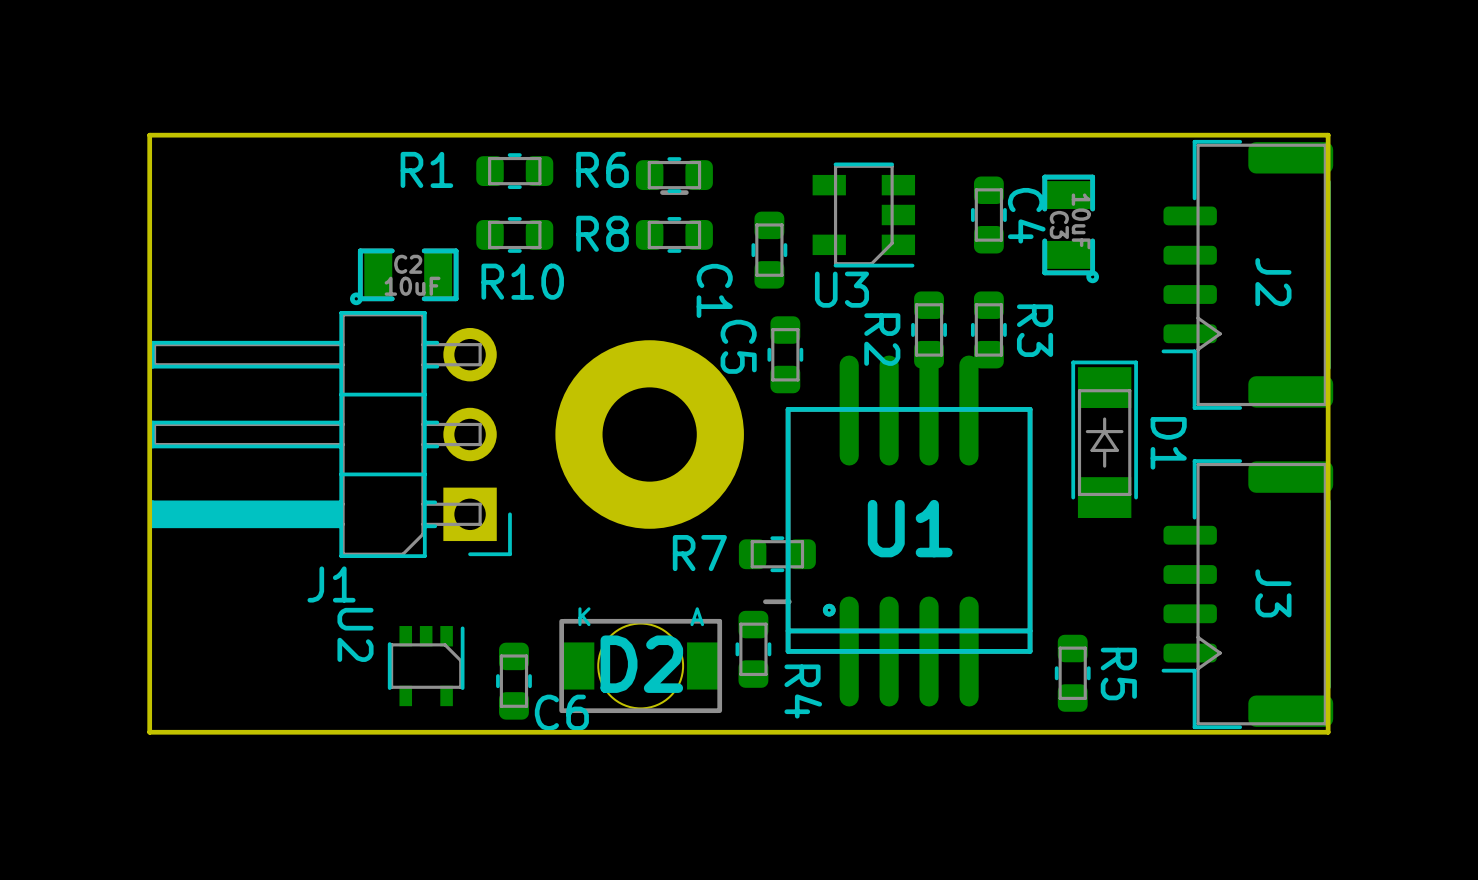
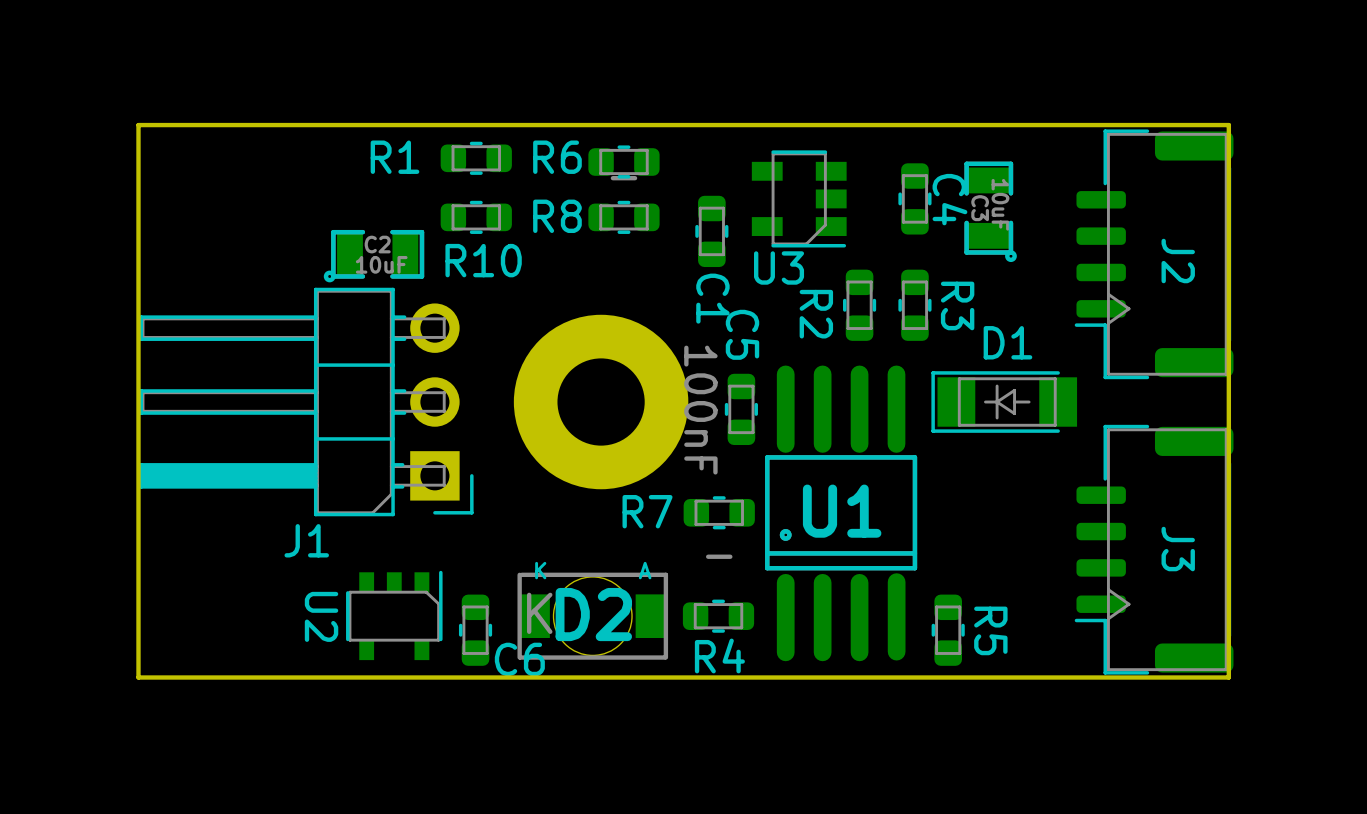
C1 name position: C1 (714, 290) -> C1 (712, 298)
C5 name position: C5 (738, 346) -> C5 (742, 334)
C5 position: (785, 354) -> (741, 409)
U1 footprint: [785, 355, 1033, 707] -> [765, 365, 918, 662]
D1 rotation: 0° (1104, 439) -> 90° counterclockwise (1004, 402)
C5 value: none -> 100nF (700, 410)
U2 footprint: [387, 626, 465, 707] -> [346, 570, 443, 661]
U2 name position: U2 (355, 634) -> U2 (321, 616)
R4 rotation: 0° (753, 649) -> 90° clockwise (718, 616)
D2 text: none -> K (539, 613)
R5 position: (1072, 673) -> (948, 630)

